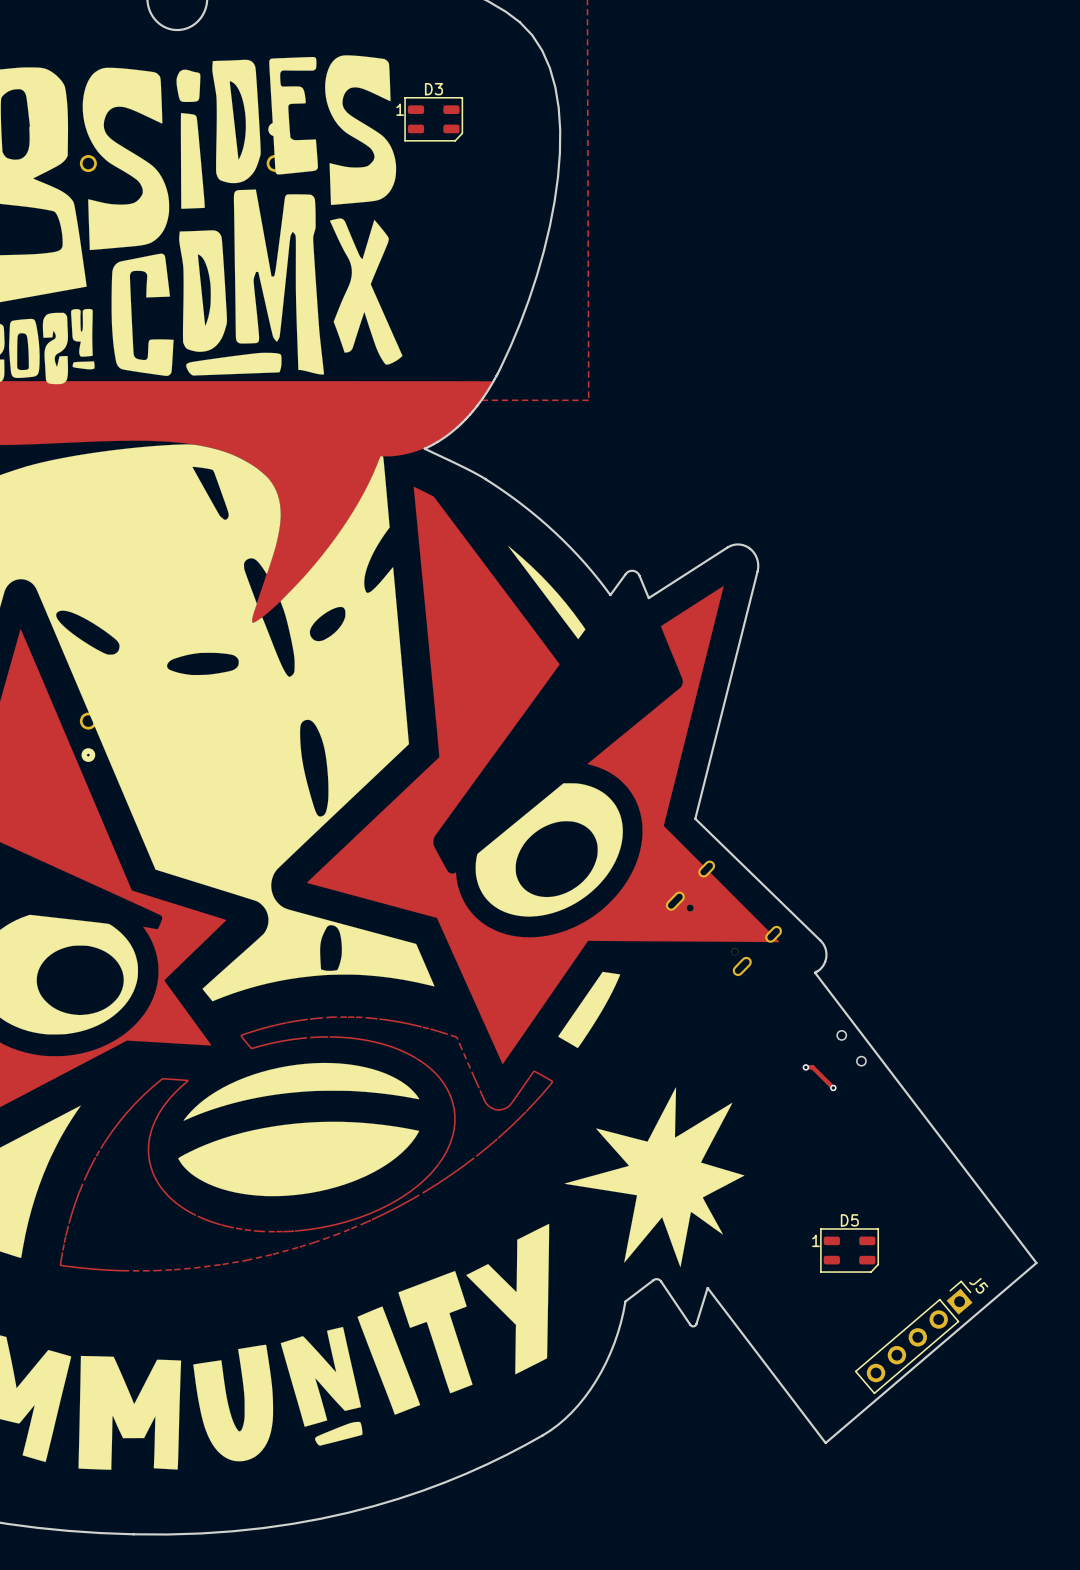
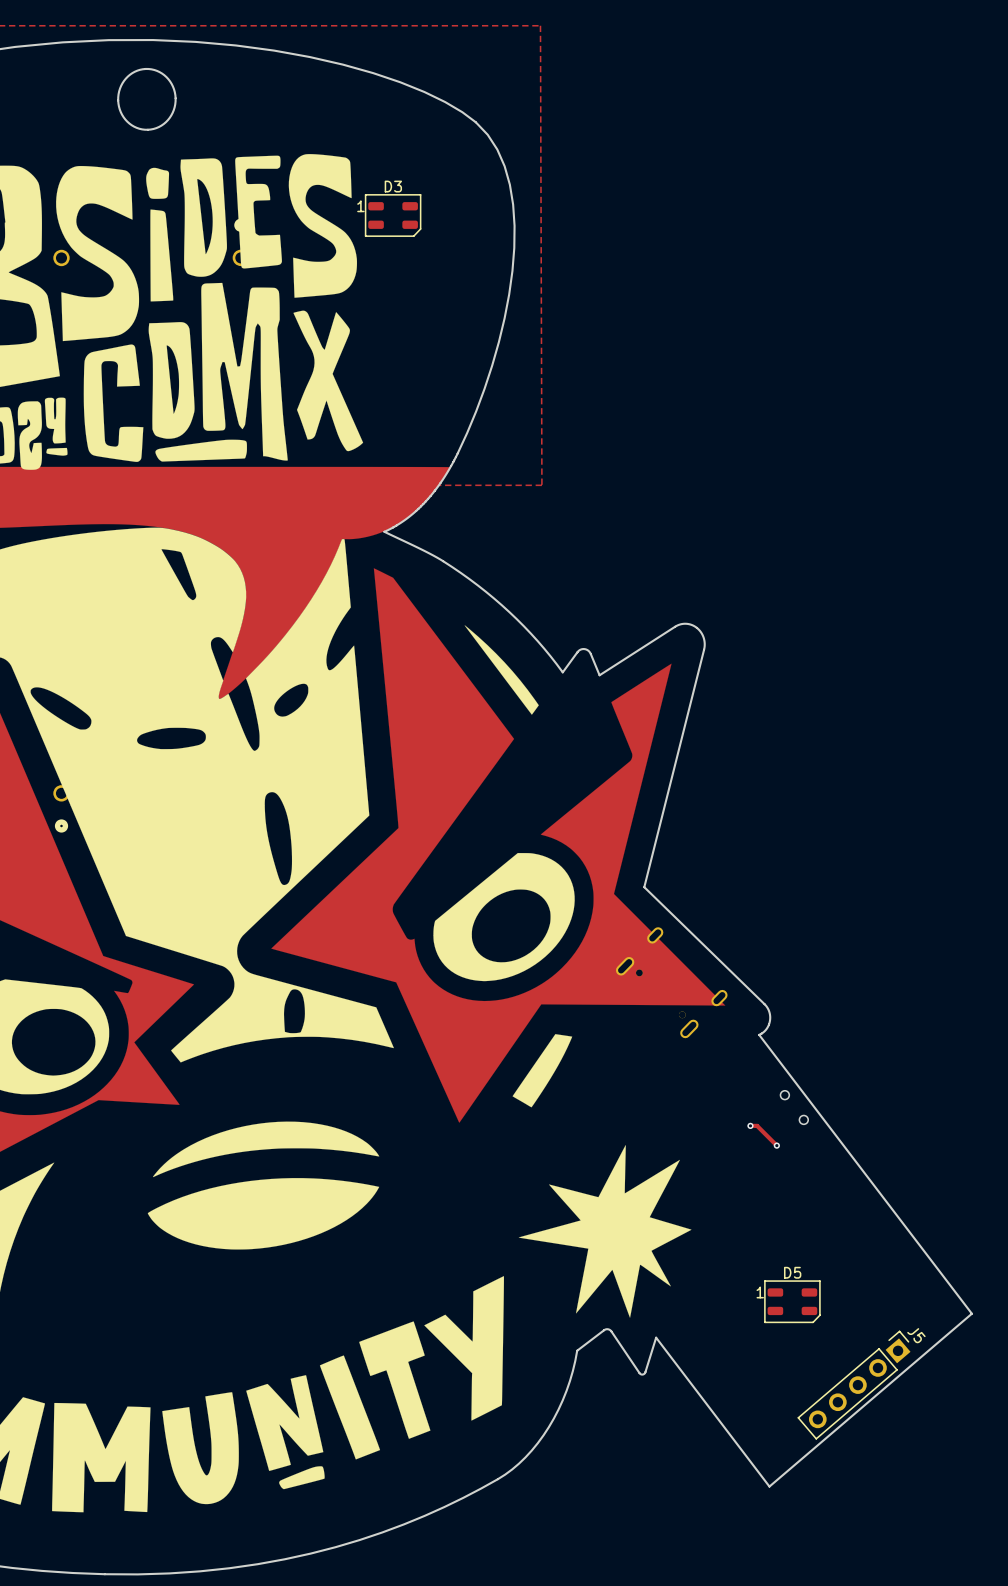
zone outline: (250, 1047) (240, 1035) (281, 1023) (332, 1017) (377, 1018) (416, 1025) (456, 1037) (485, 1102) (493, 1108) (500, 1109) (510, 1104) (533, 1071) (552, 1081) (508, 1128) (452, 1173) (396, 1207) (334, 1235) (272, 1254) (194, 1268) (122, 1270) (60, 1265) (68, 1225) (82, 1185) (99, 1150) (126, 1112) -> none
zone outline: (250, 1047) (300, 1038) (340, 1037) (376, 1042) (410, 1054) (435, 1073) (444, 1084) (451, 1098) (454, 1124) (446, 1152) (433, 1170) (418, 1185) (398, 1199) (372, 1212) (344, 1222) (311, 1229) (289, 1231) (251, 1230) (215, 1223) (188, 1211) (166, 1194) (153, 1173) (148, 1150) (152, 1126) (163, 1106) (188, 1080) (162, 1078) (126, 1112) -> none

